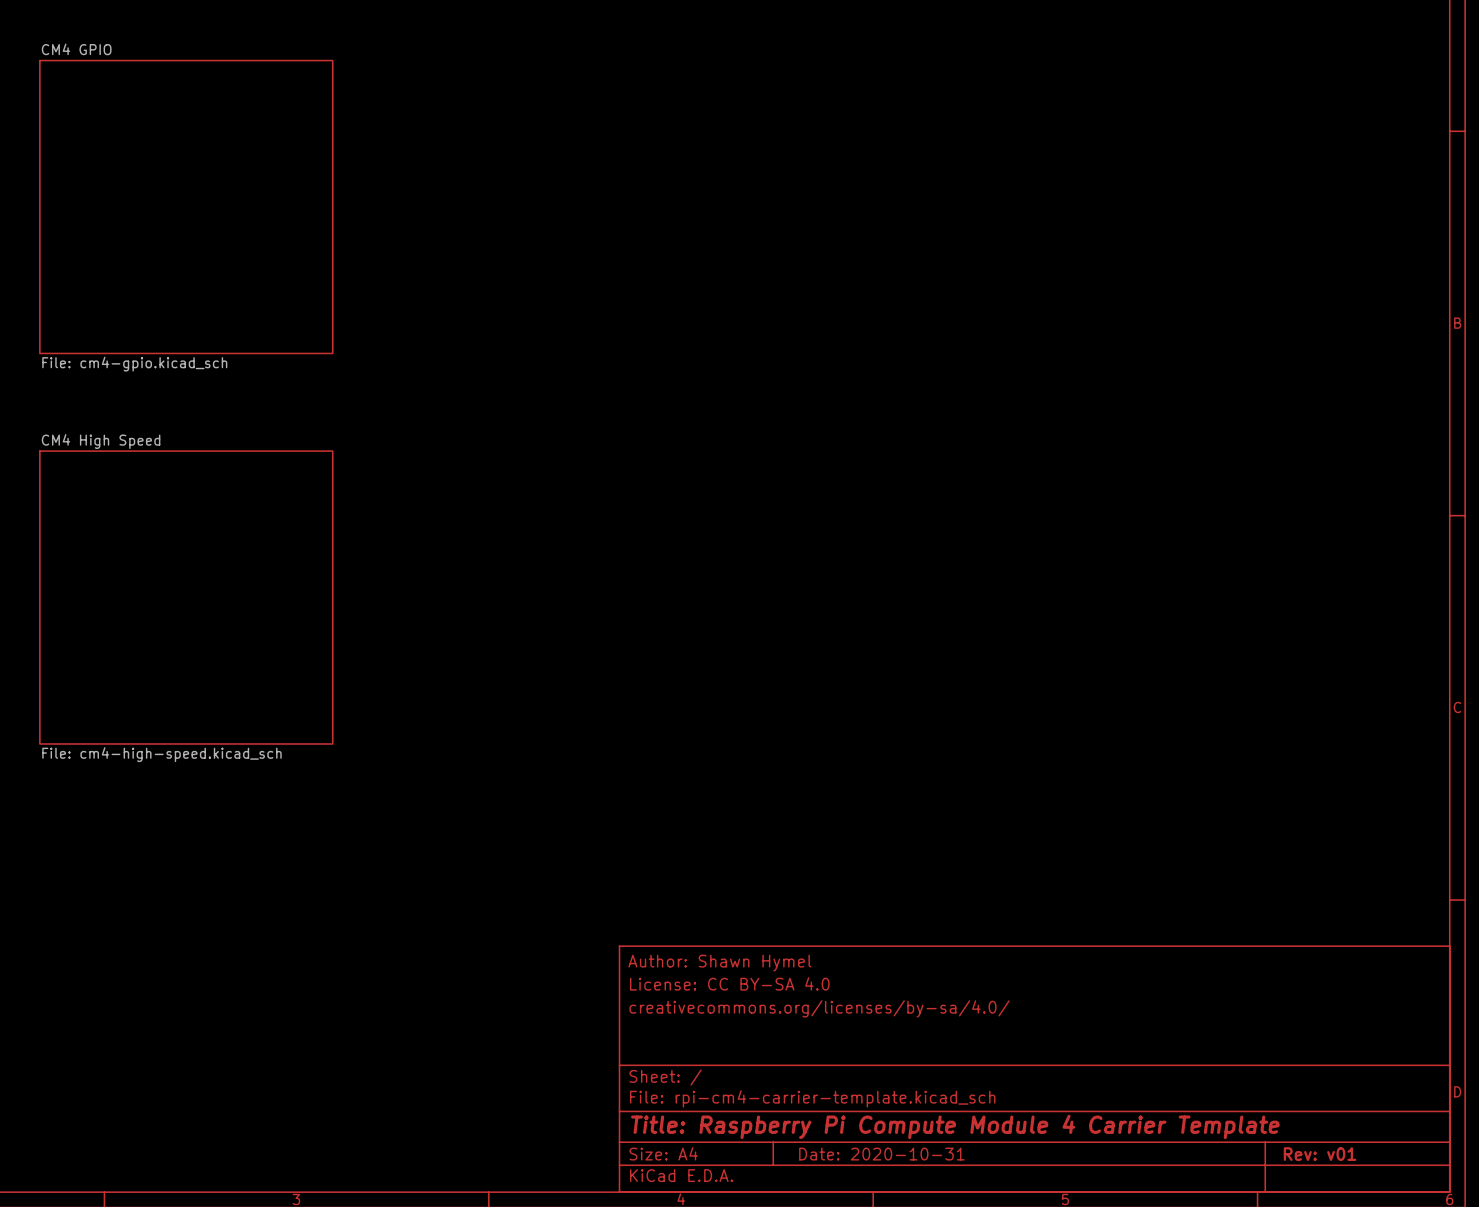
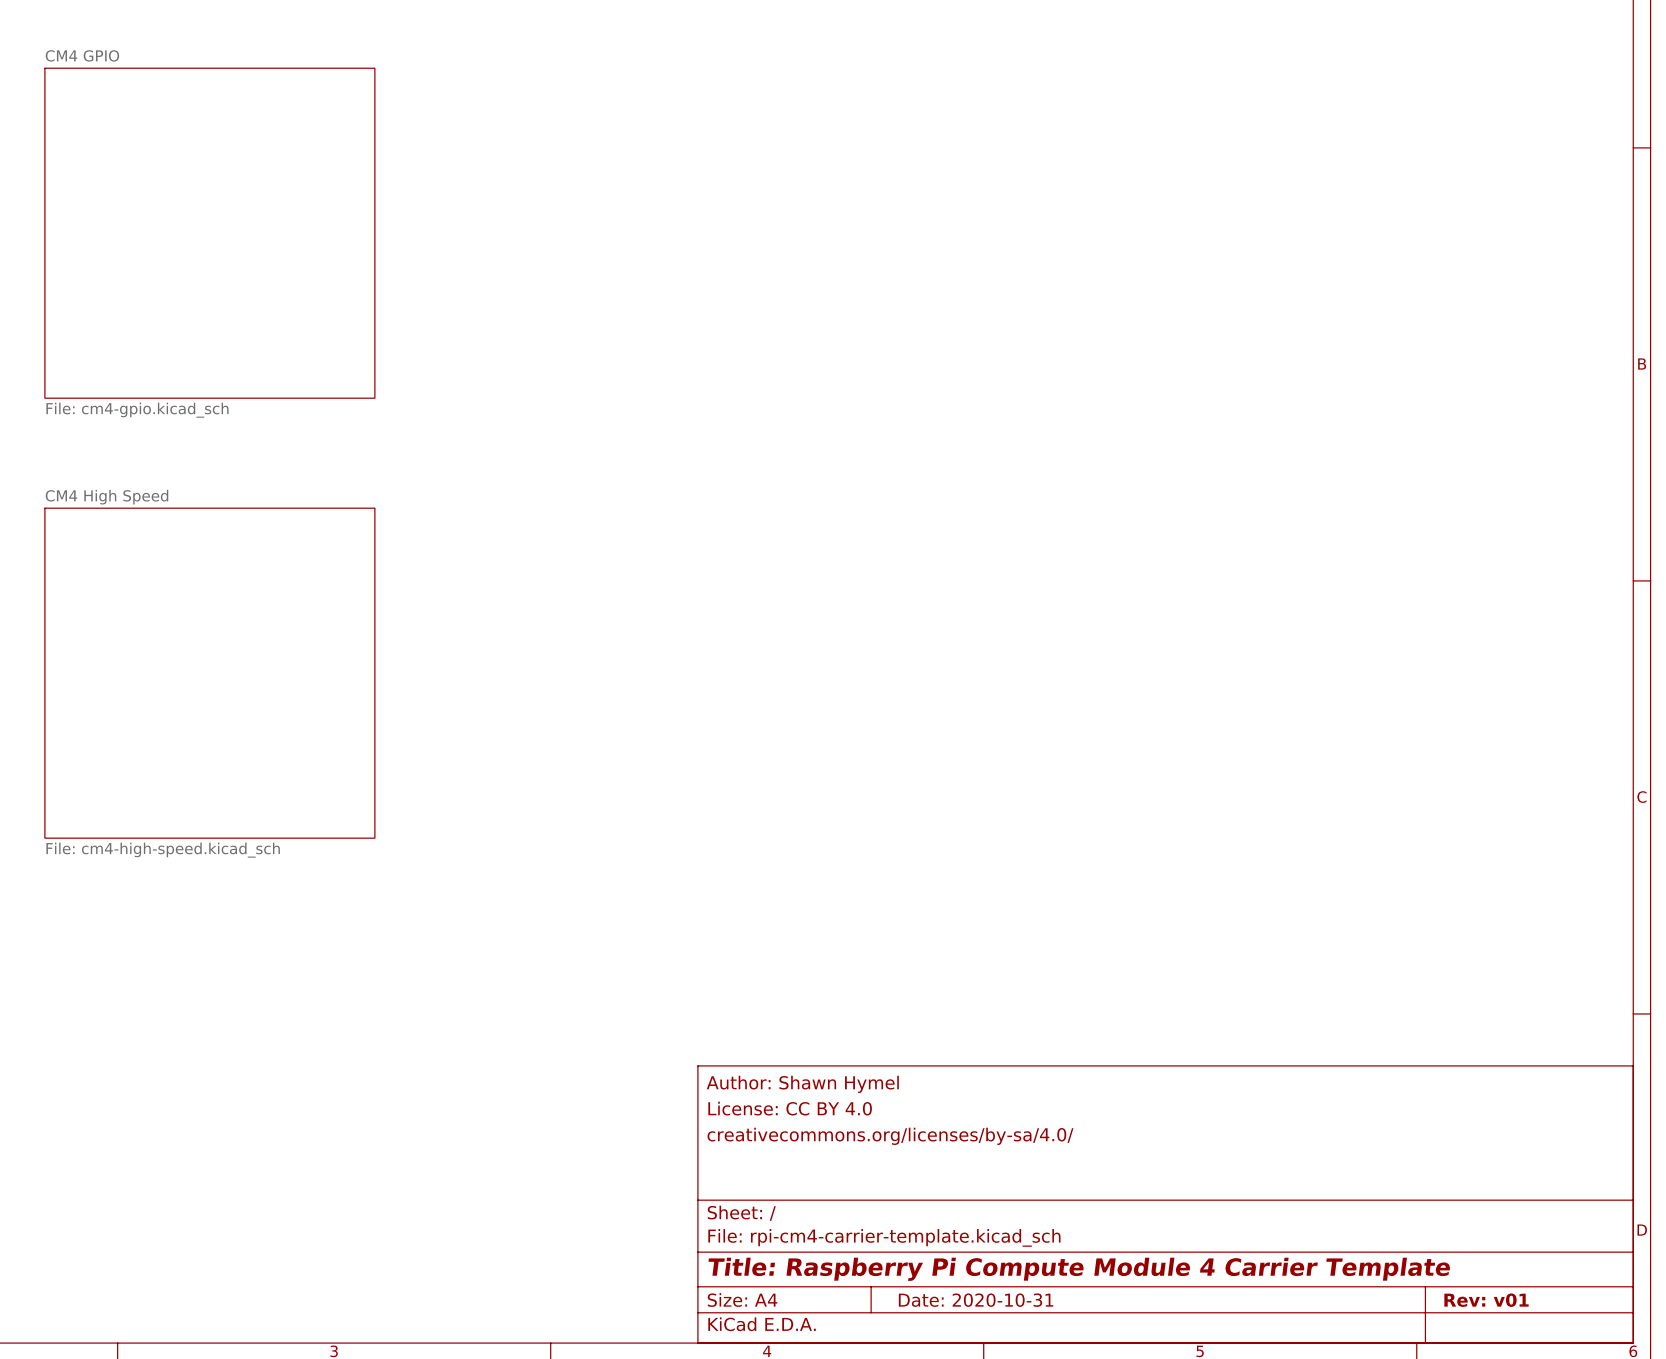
title block: License: CC BY-SA 4.0 (729, 983) -> License: CC BY 4.0 (790, 1108)

